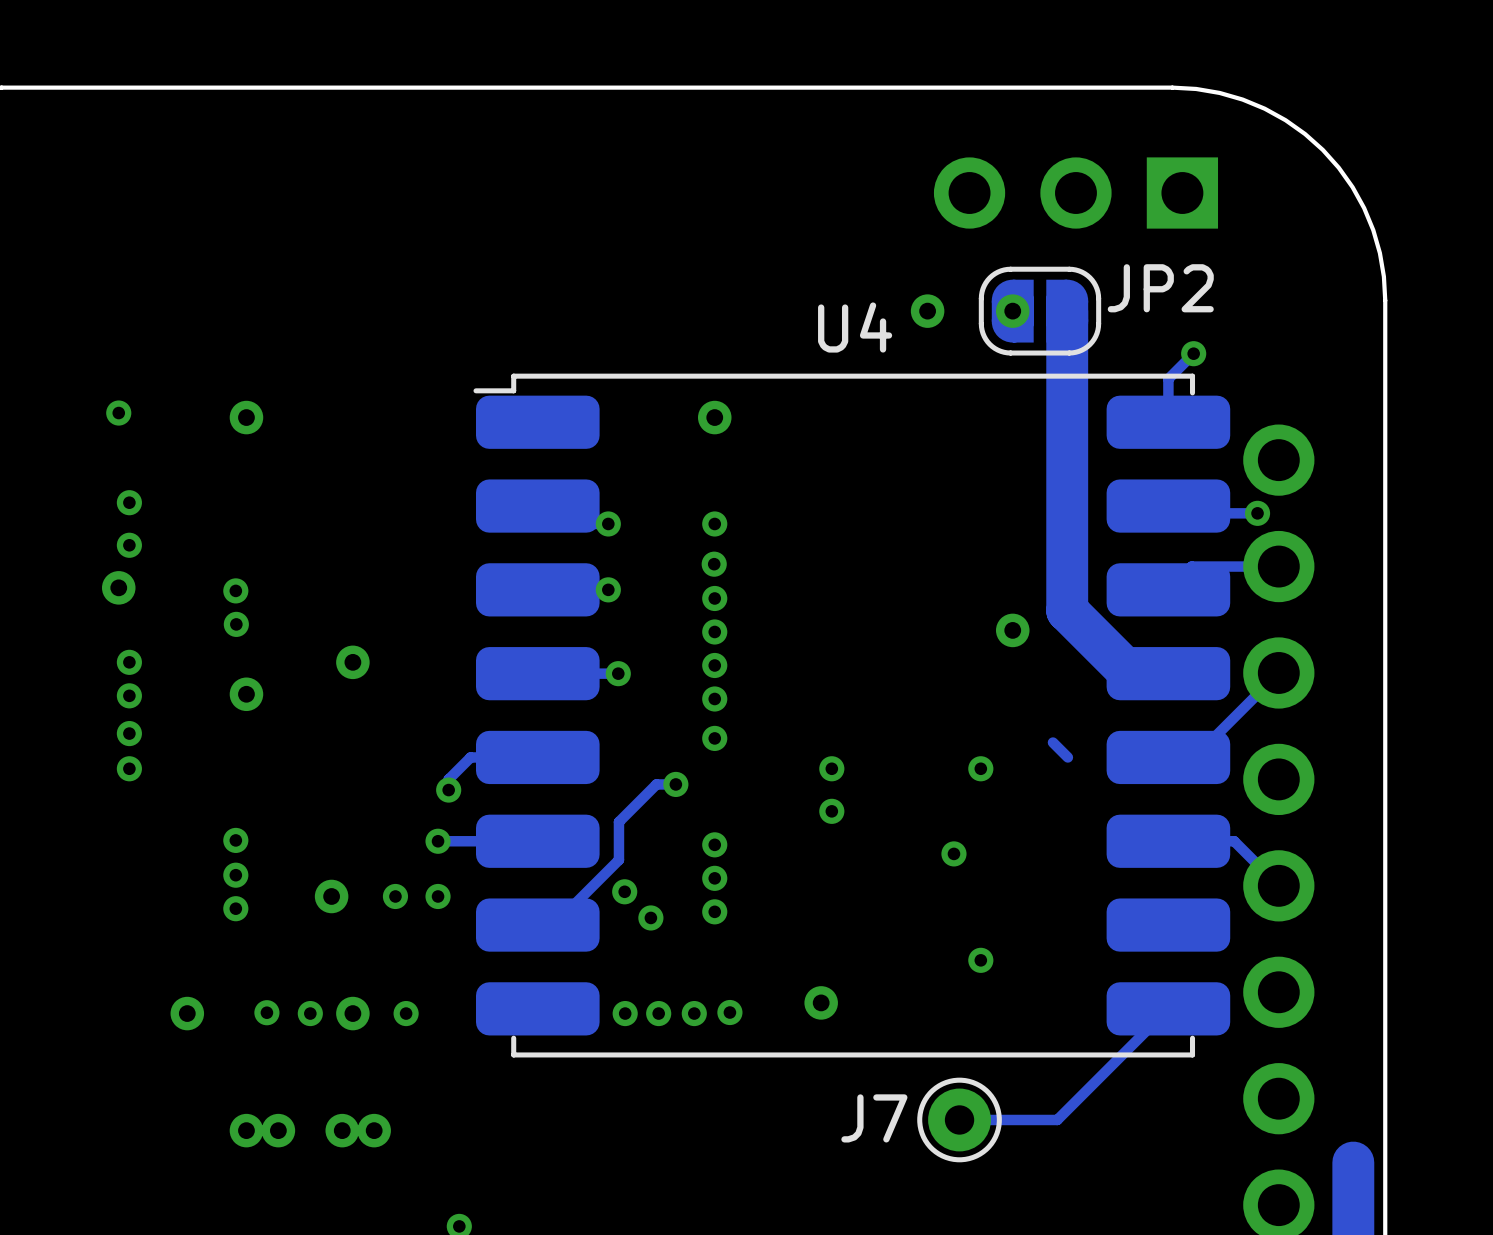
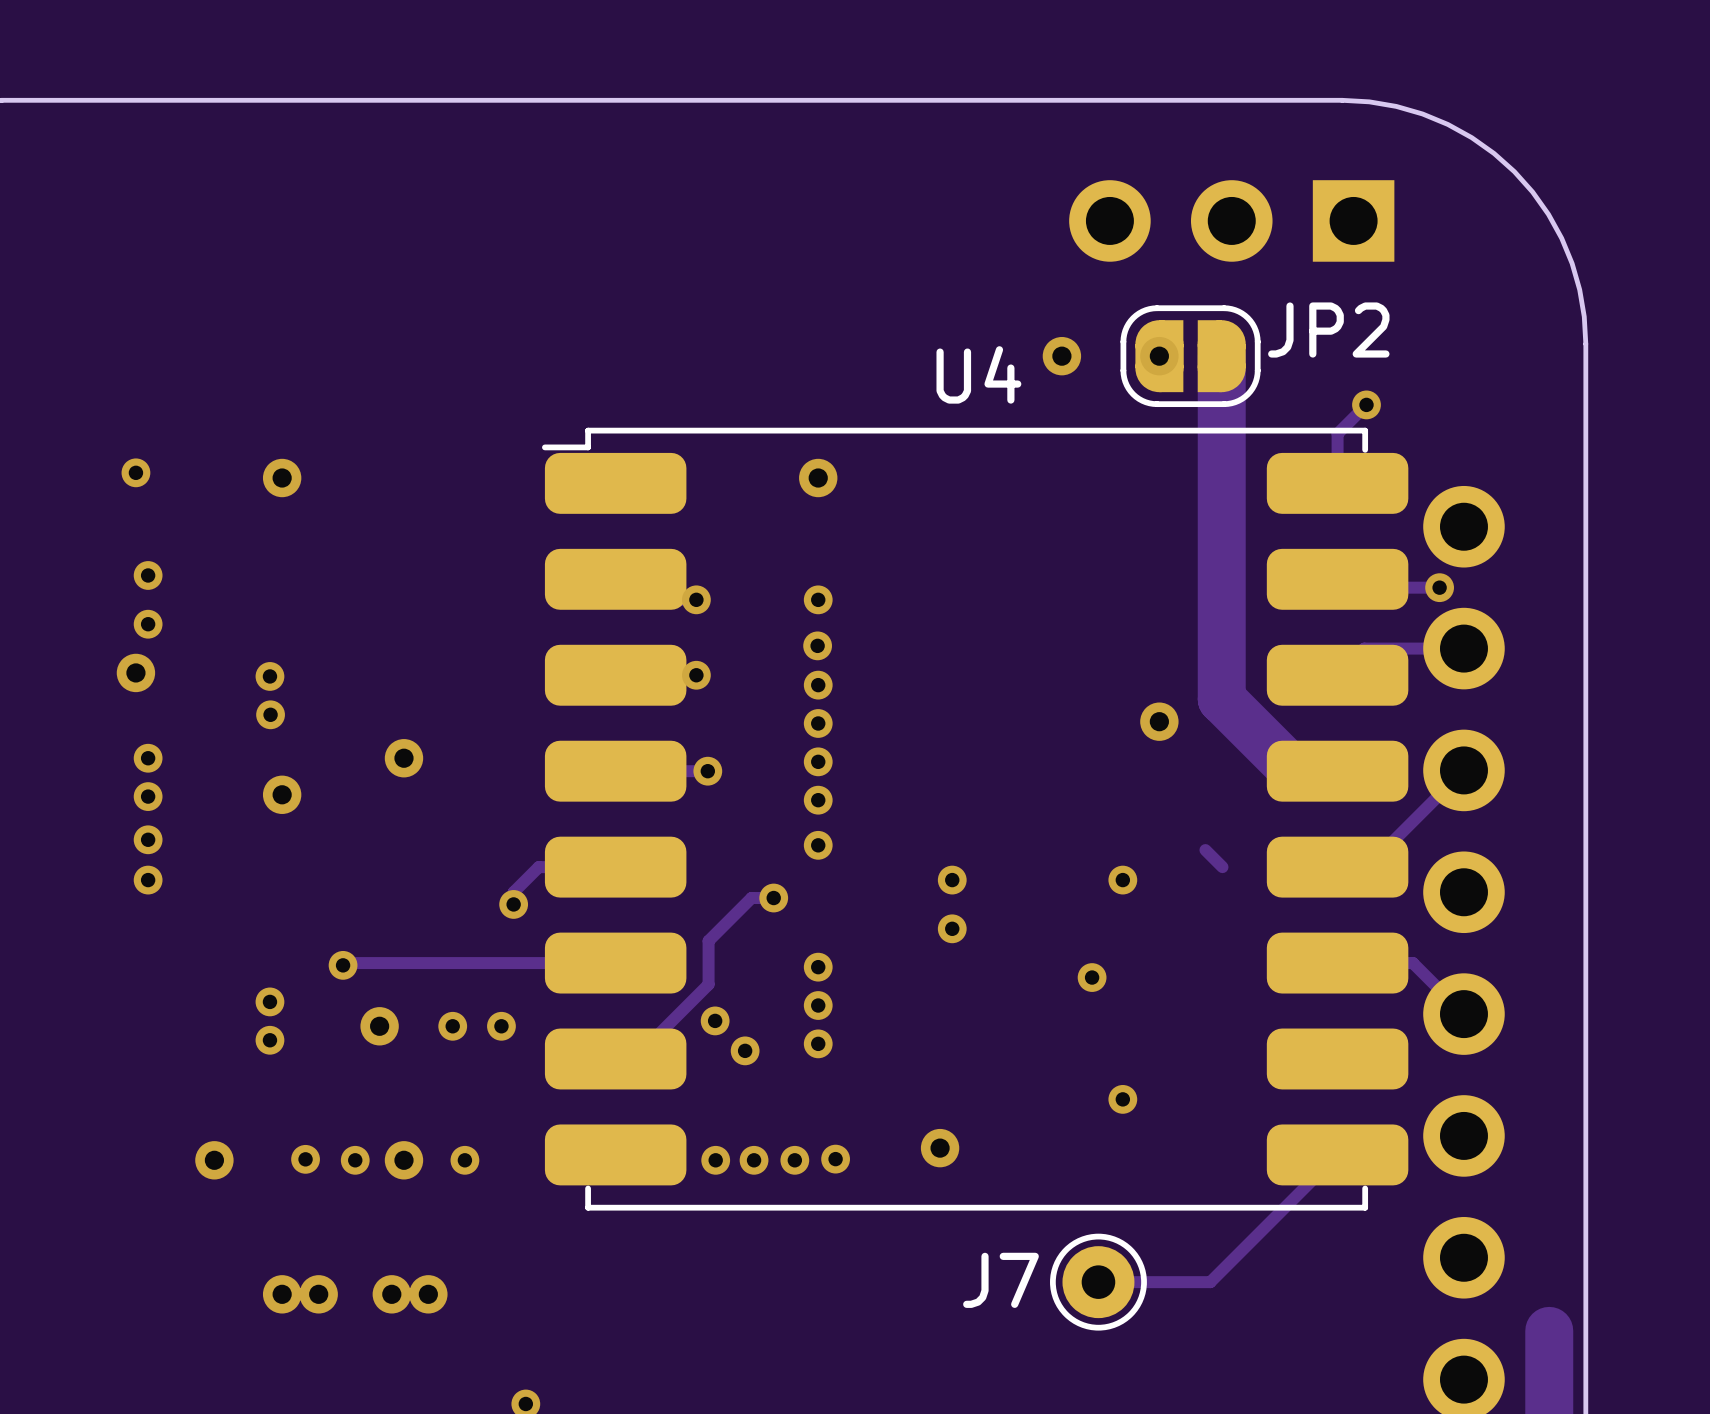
via position: (235, 840) -> (343, 965)
track: none -> (501, 963) (345, 963) (343, 965)
via: (438, 841) -> none

